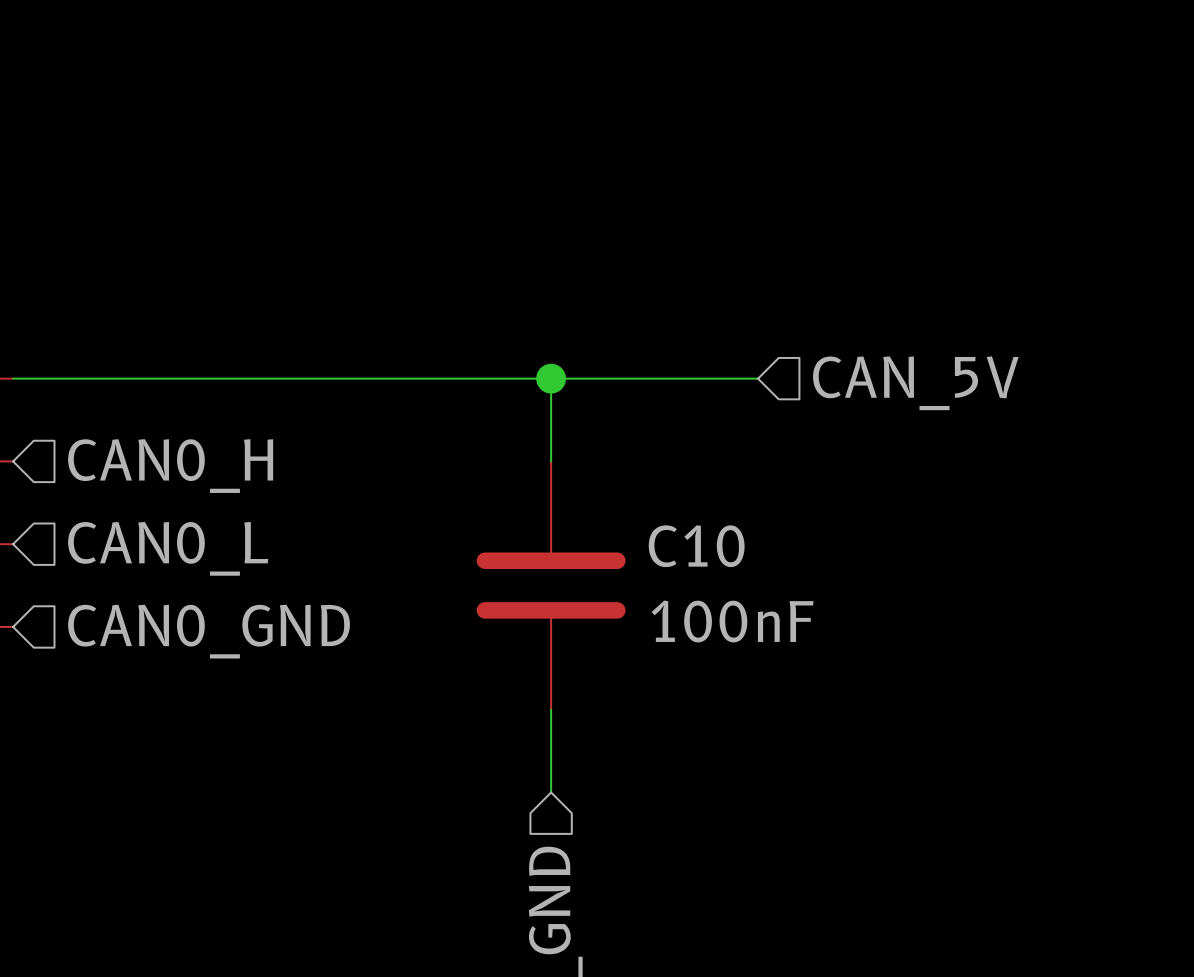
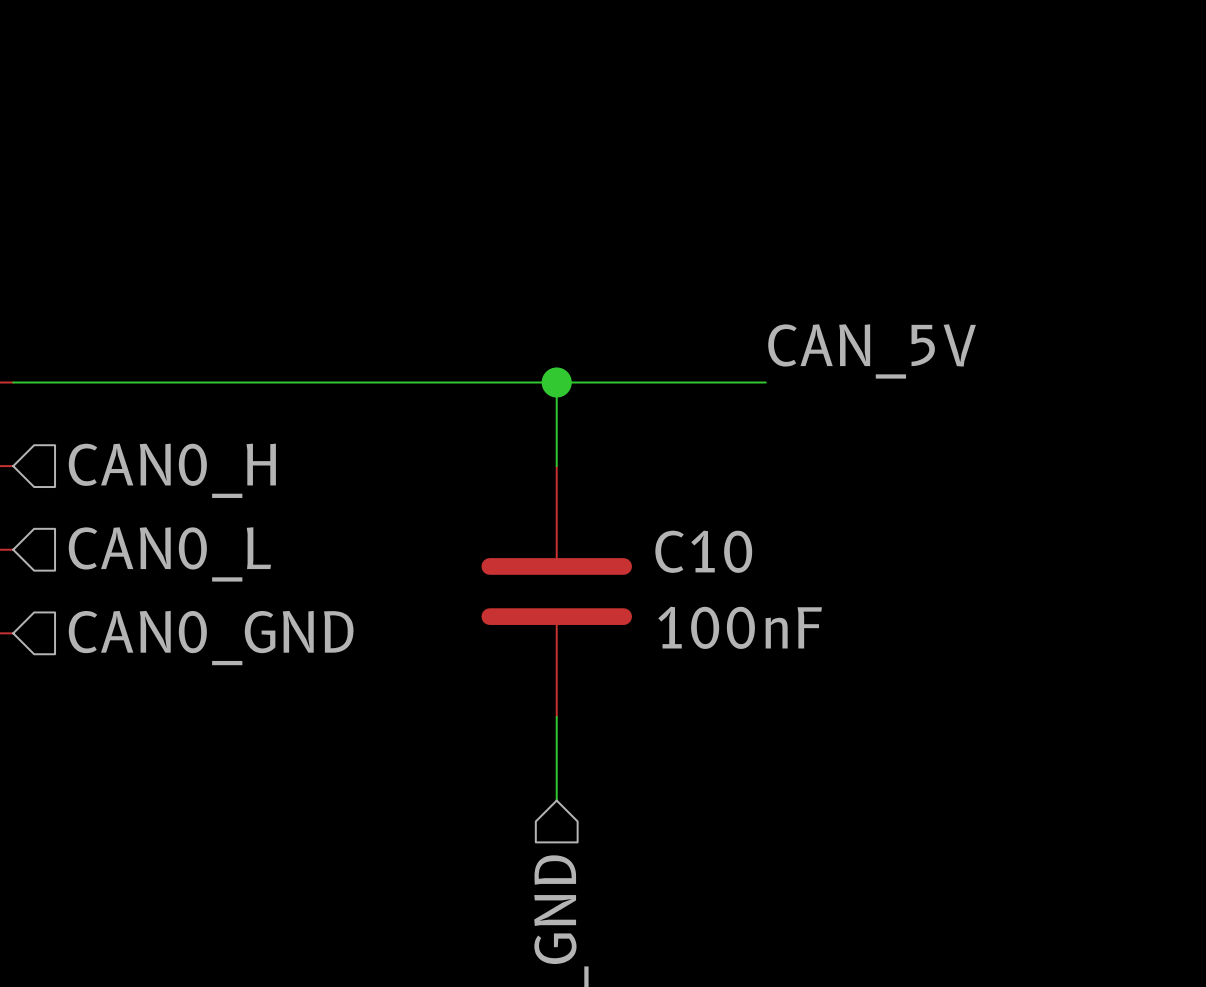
label: none -> CAN_5V (872, 351)
hierarchical label: CAN_5V (915, 383) -> none

